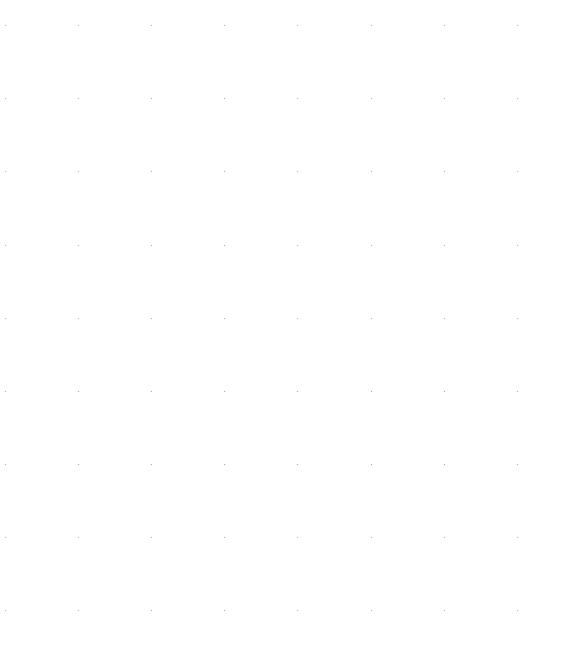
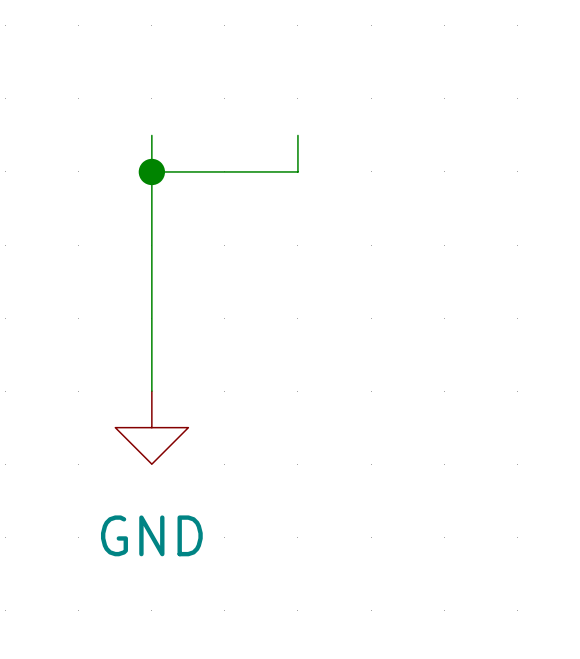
wire: none -> (151, 135) (151, 391)
wire: none -> (297, 135) (297, 171) (151, 171)
junction: none -> (151, 171)
power symbol: none -> GND (151, 427)

